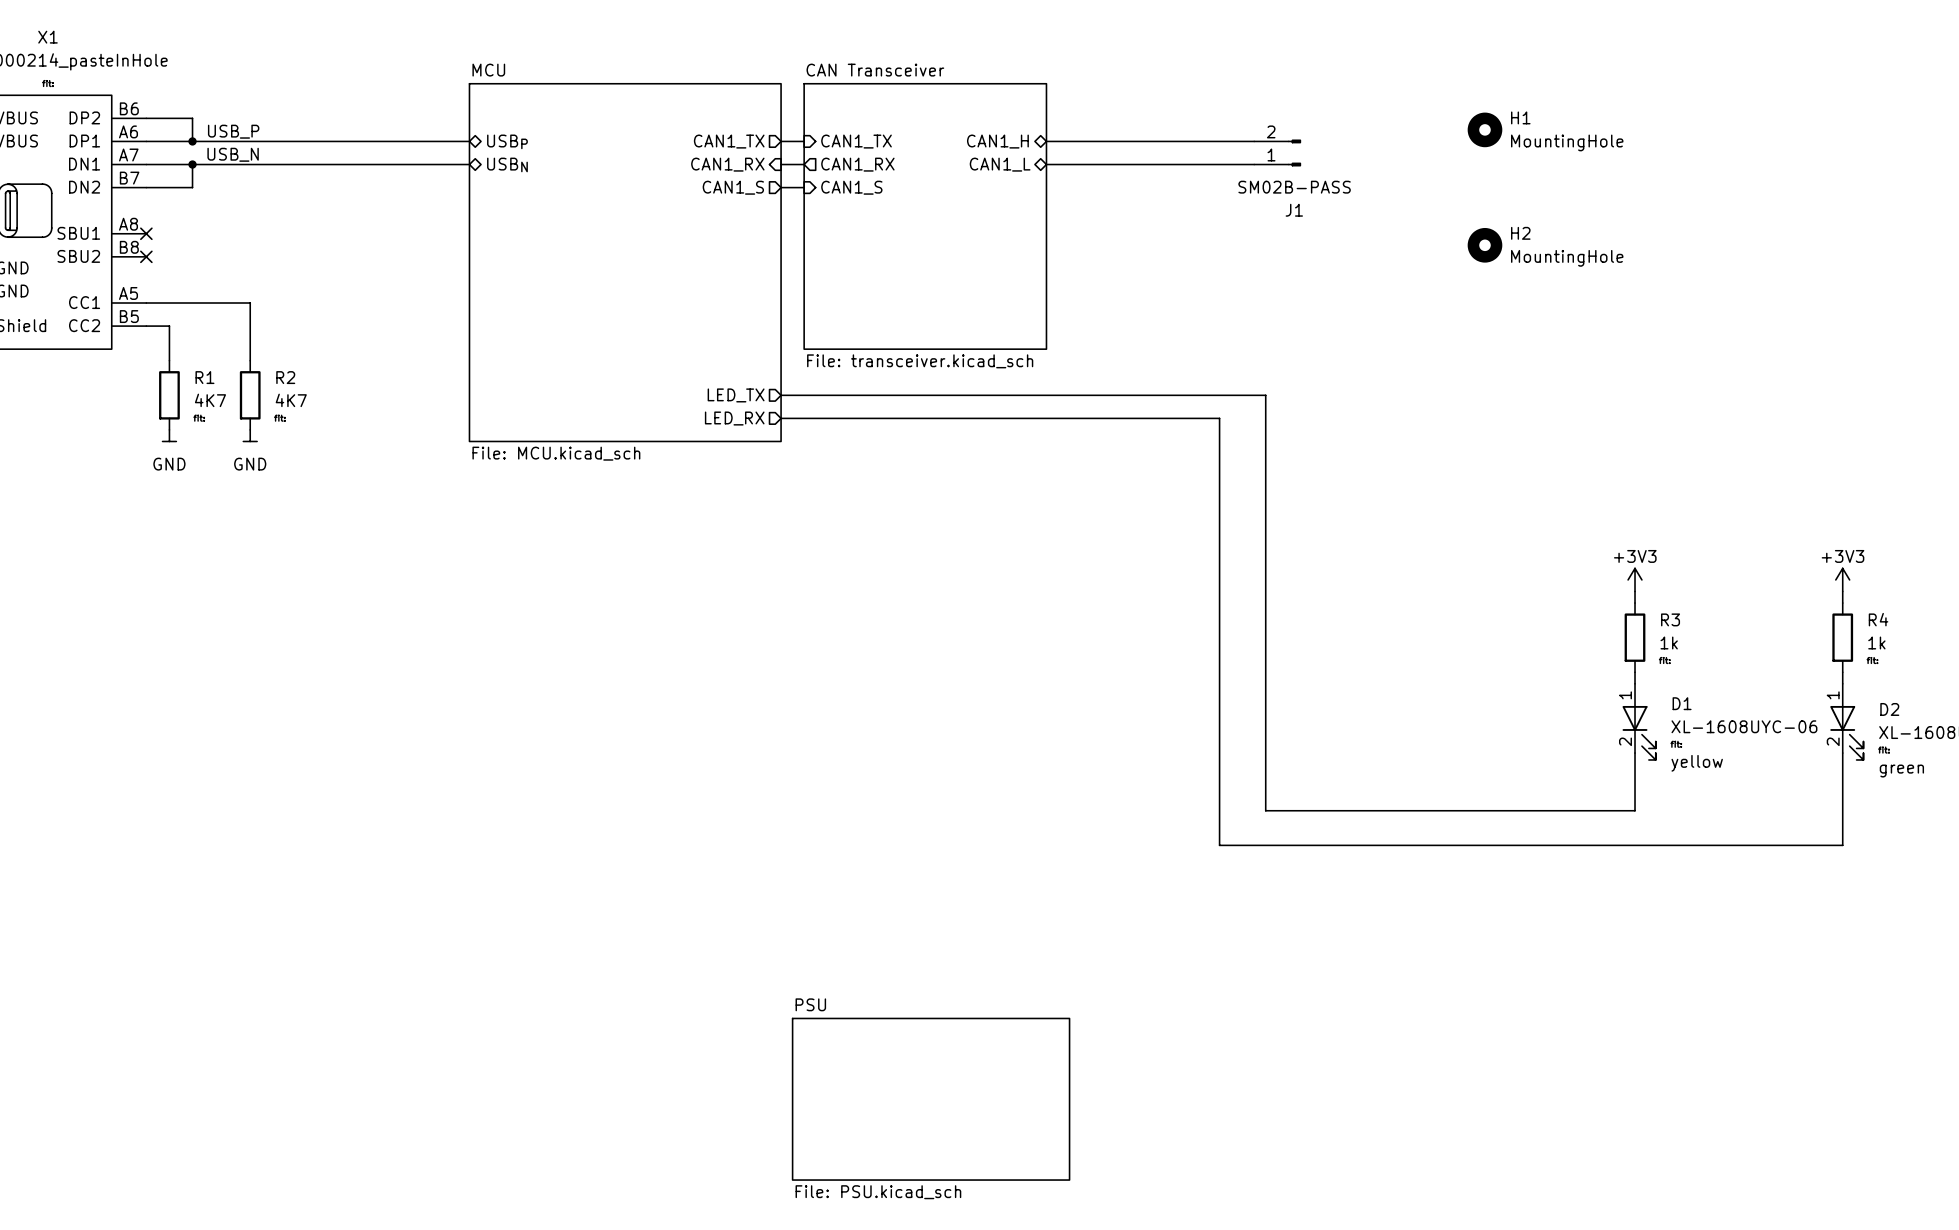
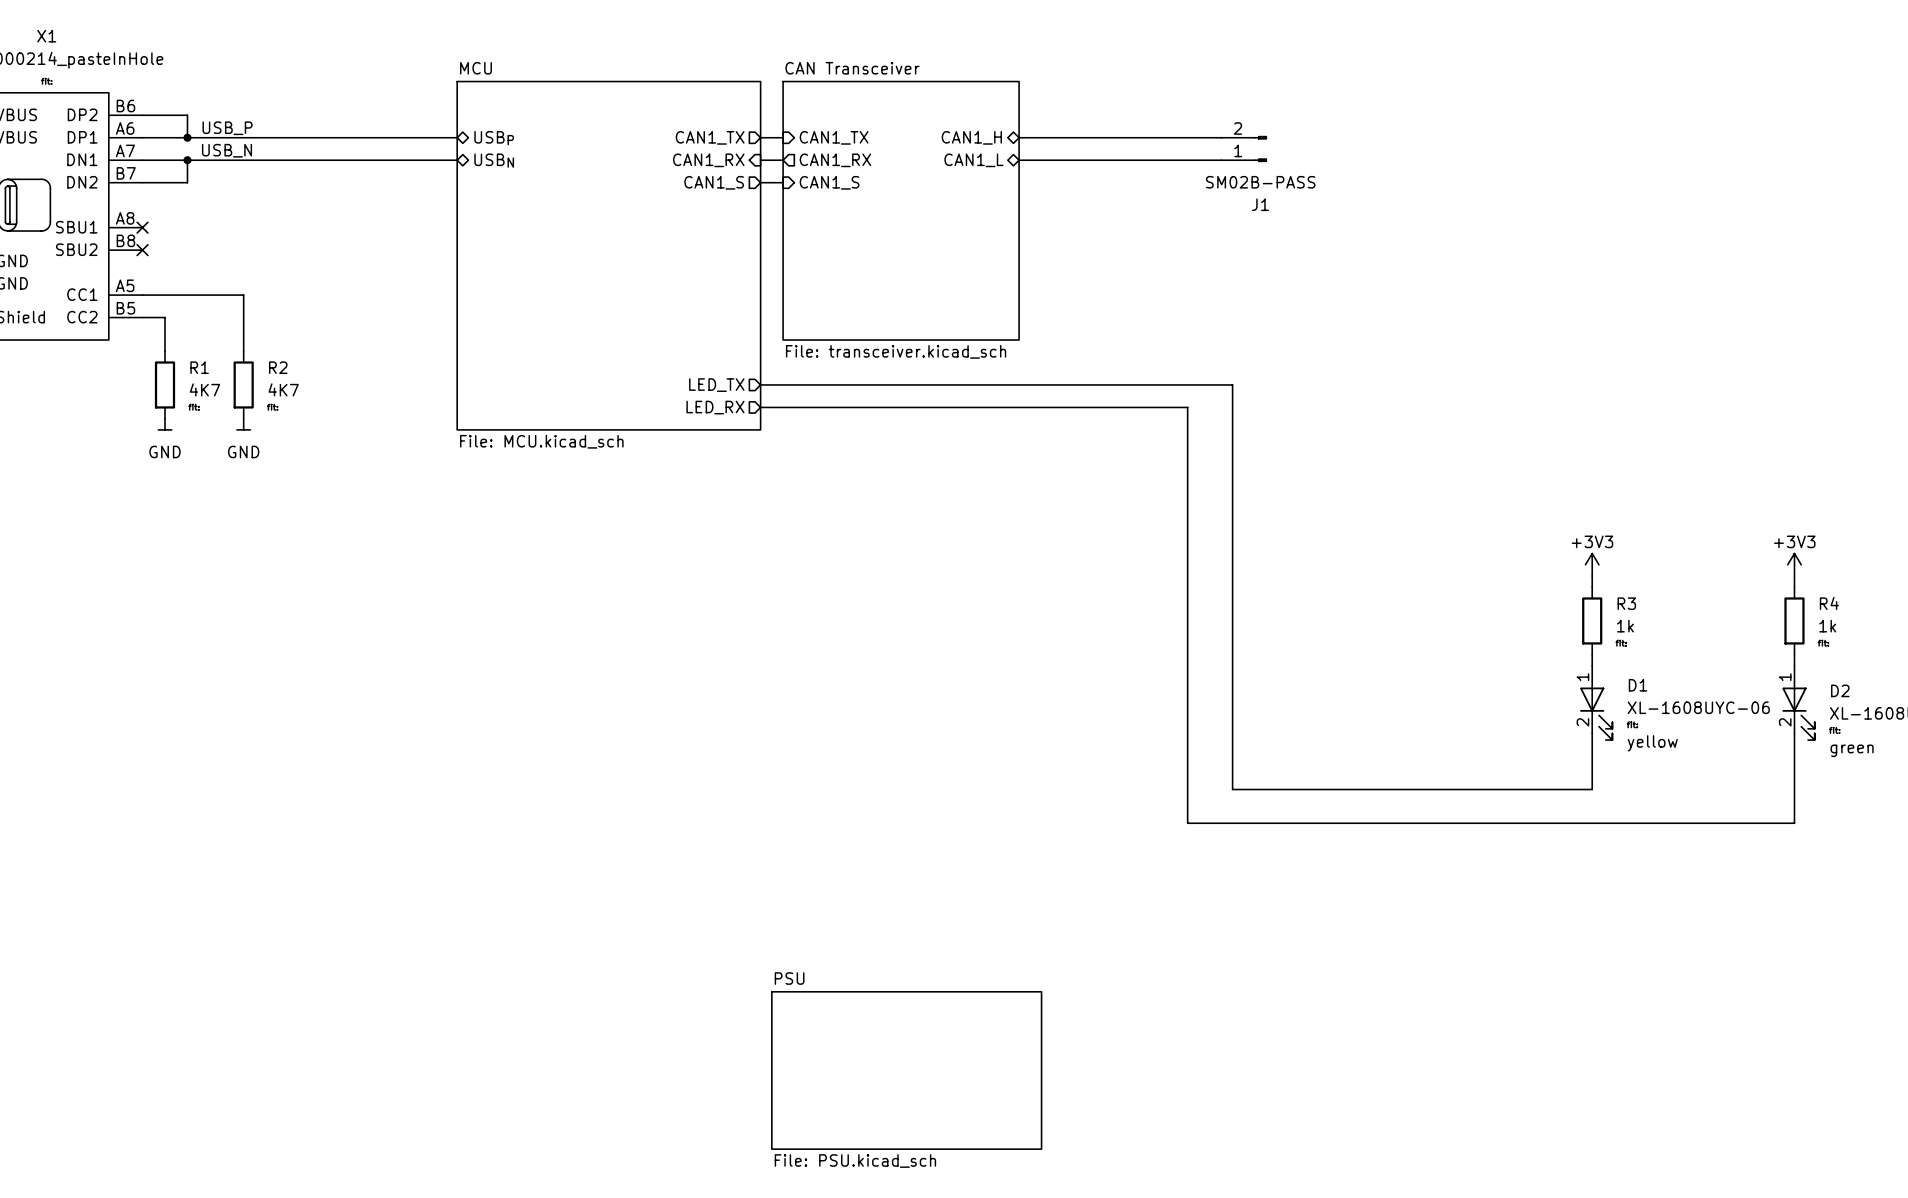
H1: MountingHole (1484, 129) -> none
H2: MountingHole (1484, 245) -> none

